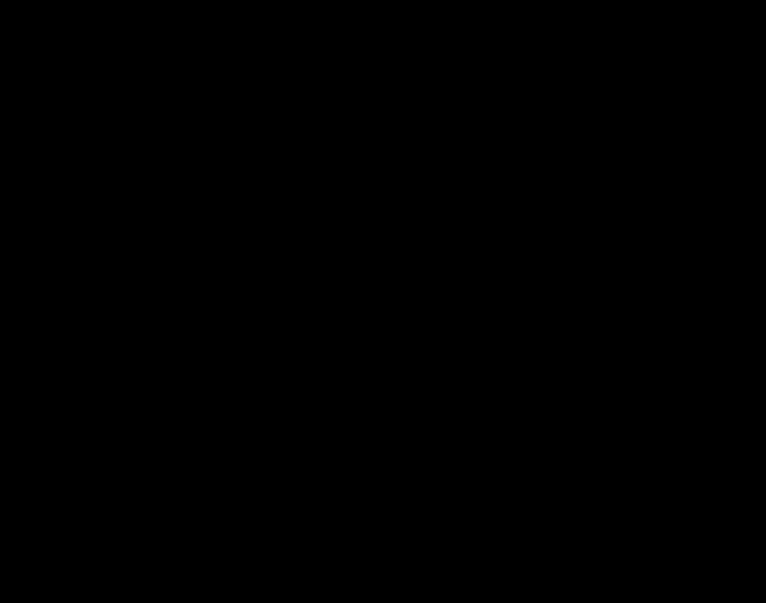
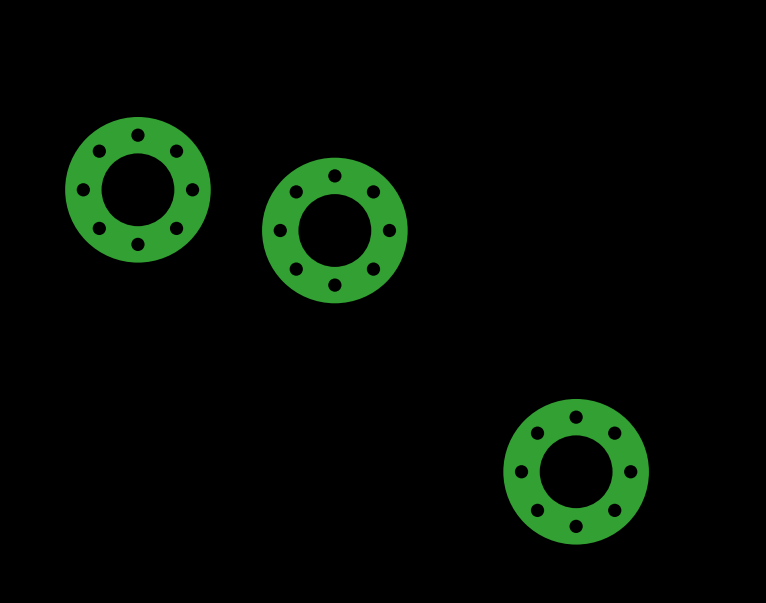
part: none -> (137, 189)
part: none -> (334, 230)
part: none -> (576, 471)

